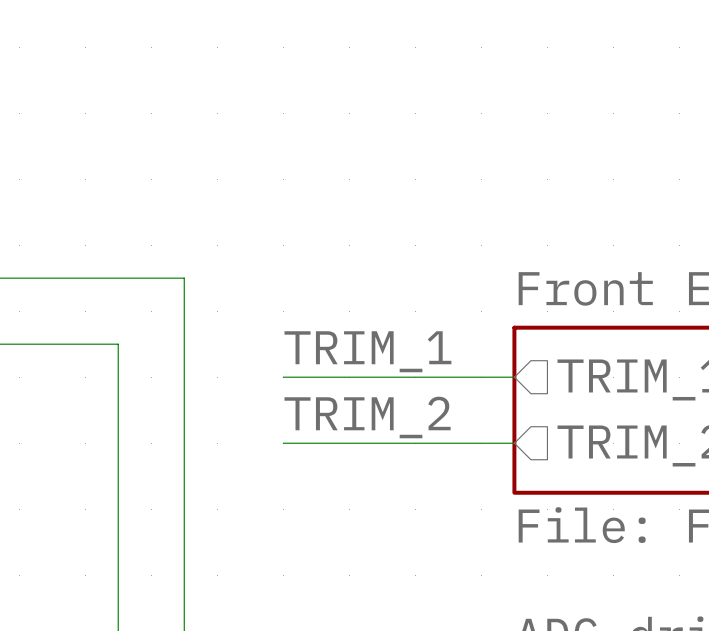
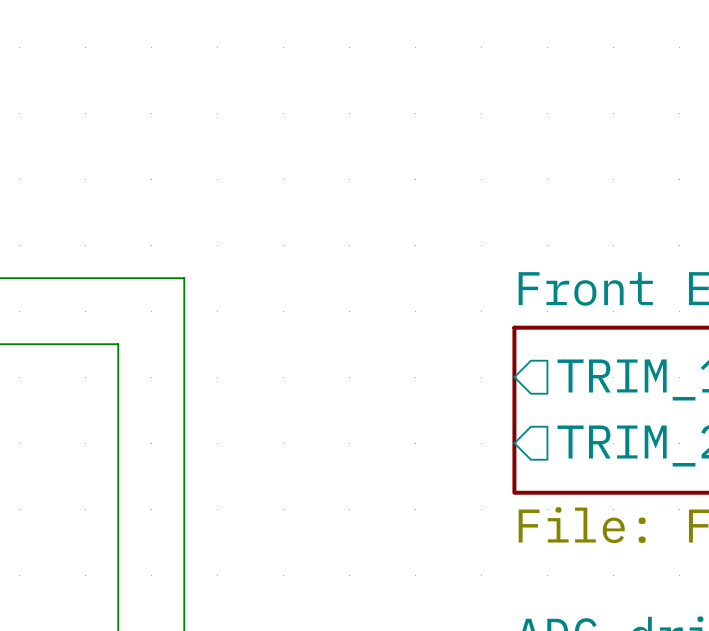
label: TRIM_1 (367, 351) -> none
wire: (283, 377) (514, 377) -> none
label: TRIM_2 (367, 417) -> none
wire: (283, 443) (514, 443) -> none

